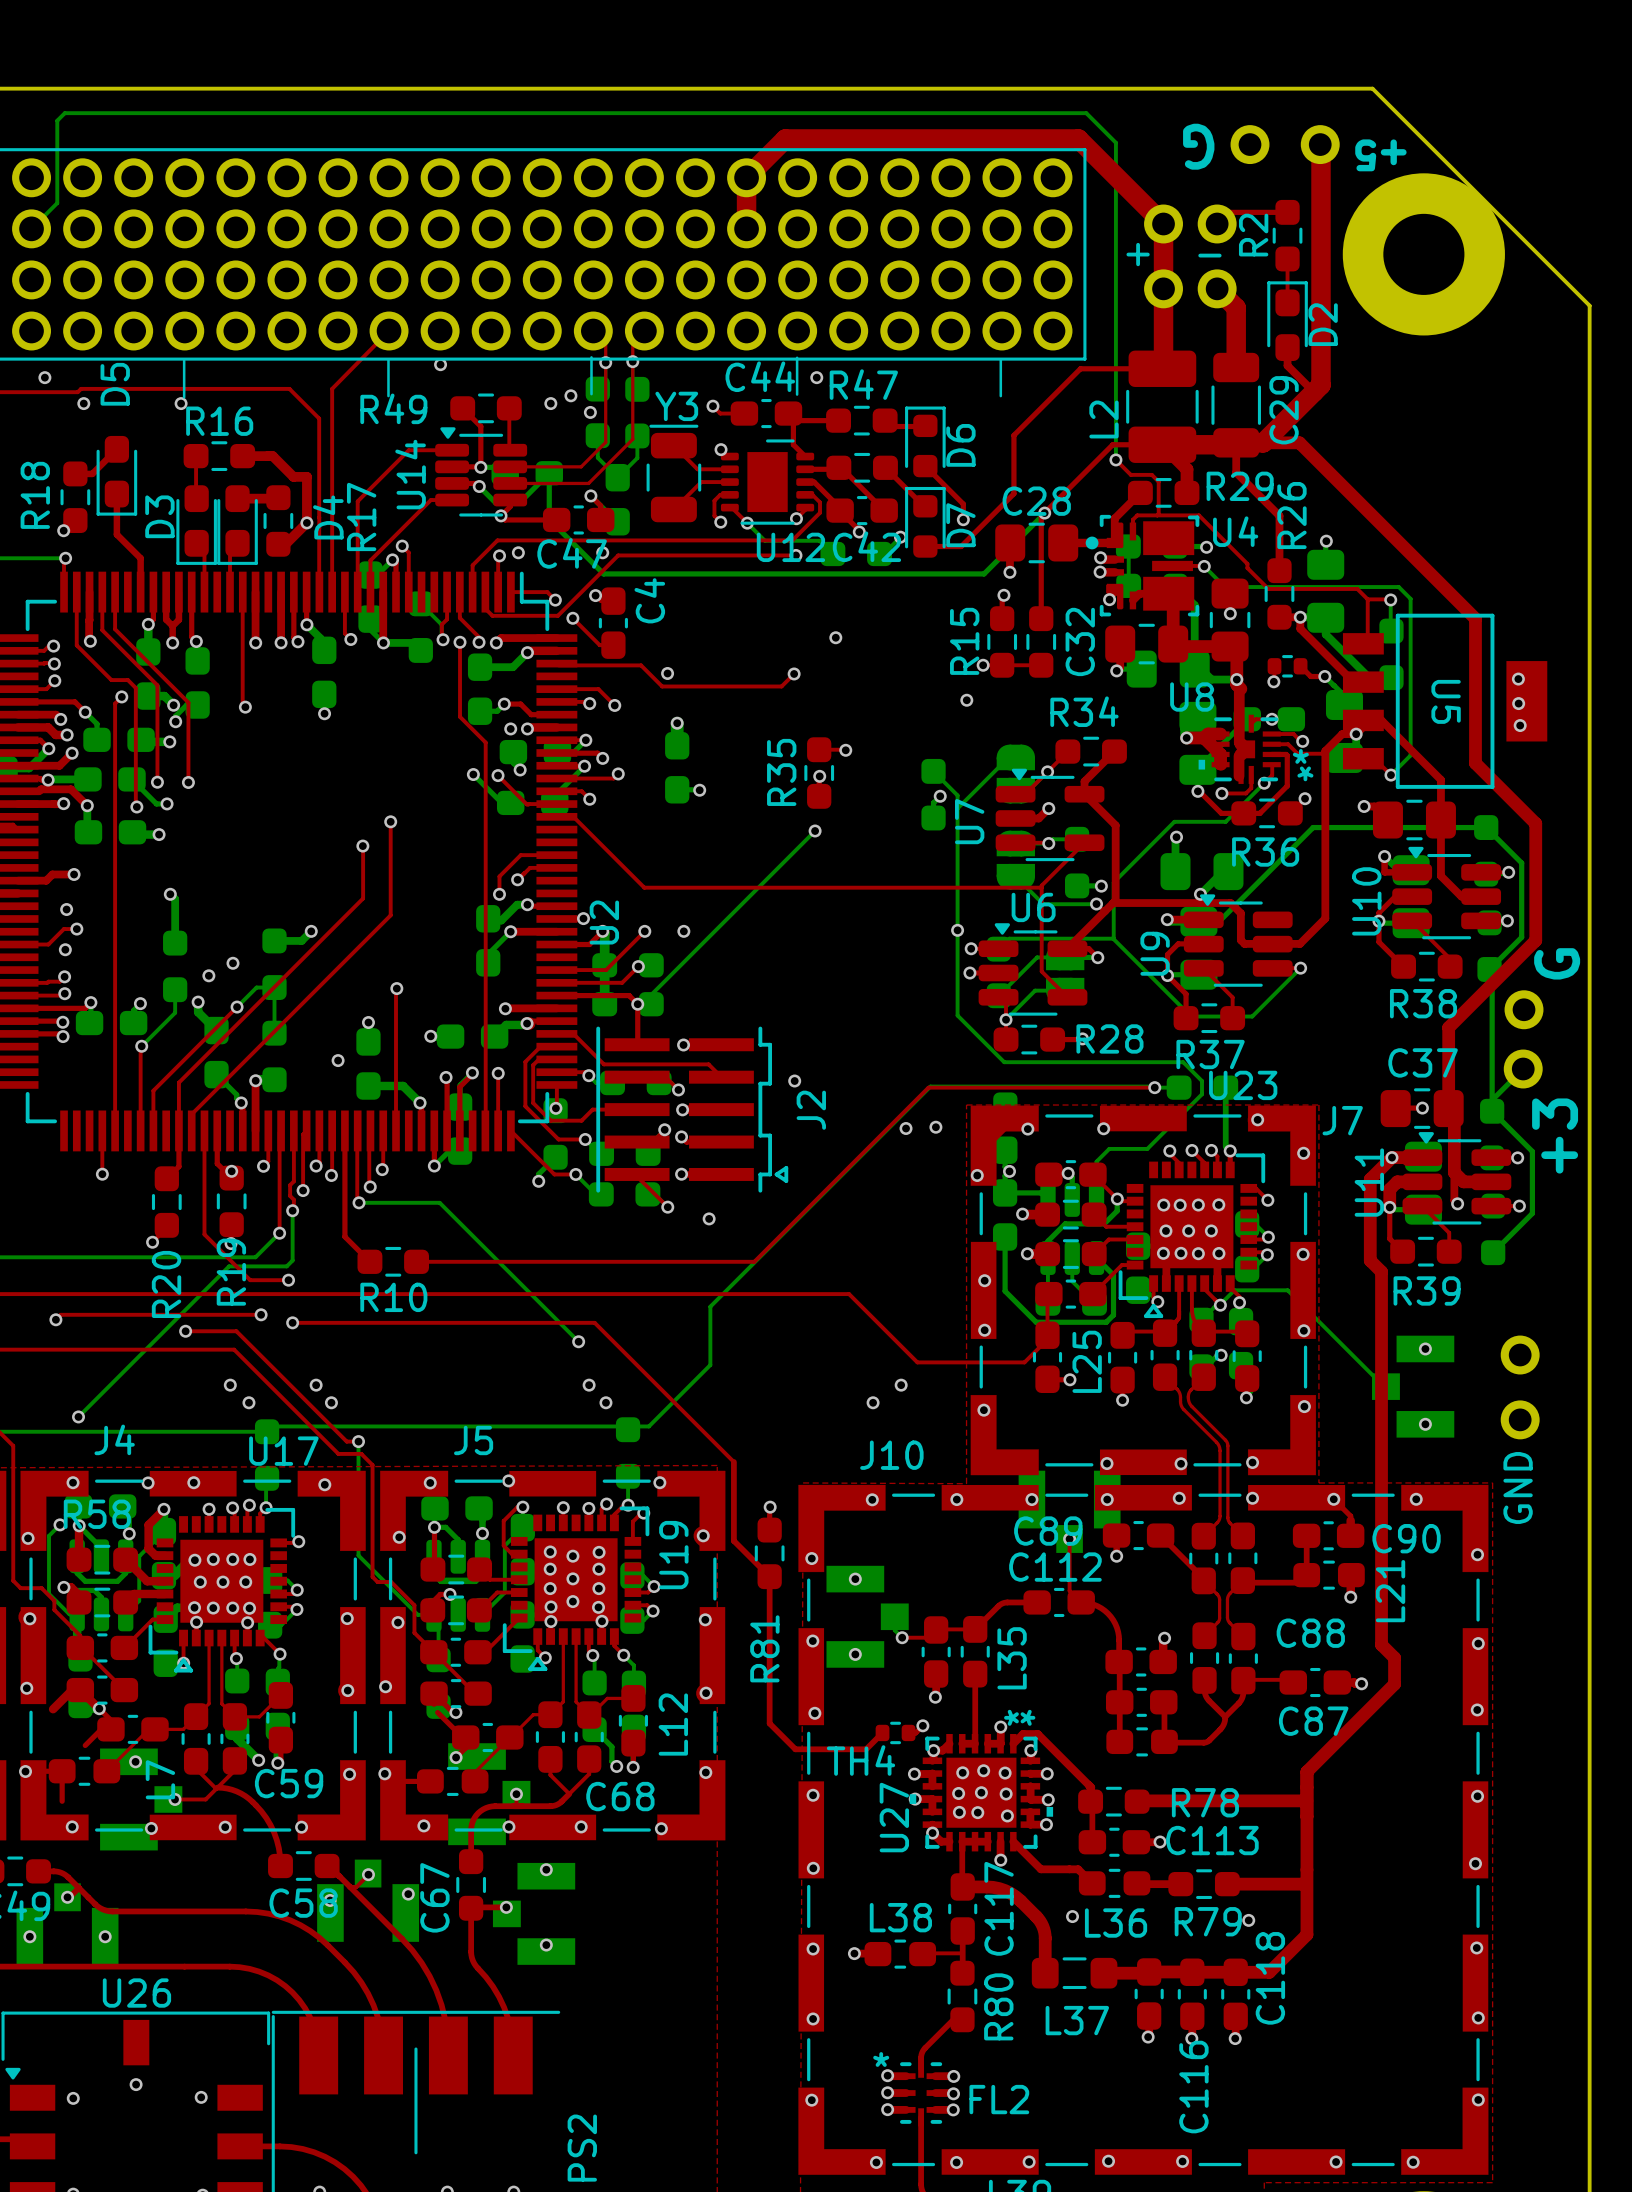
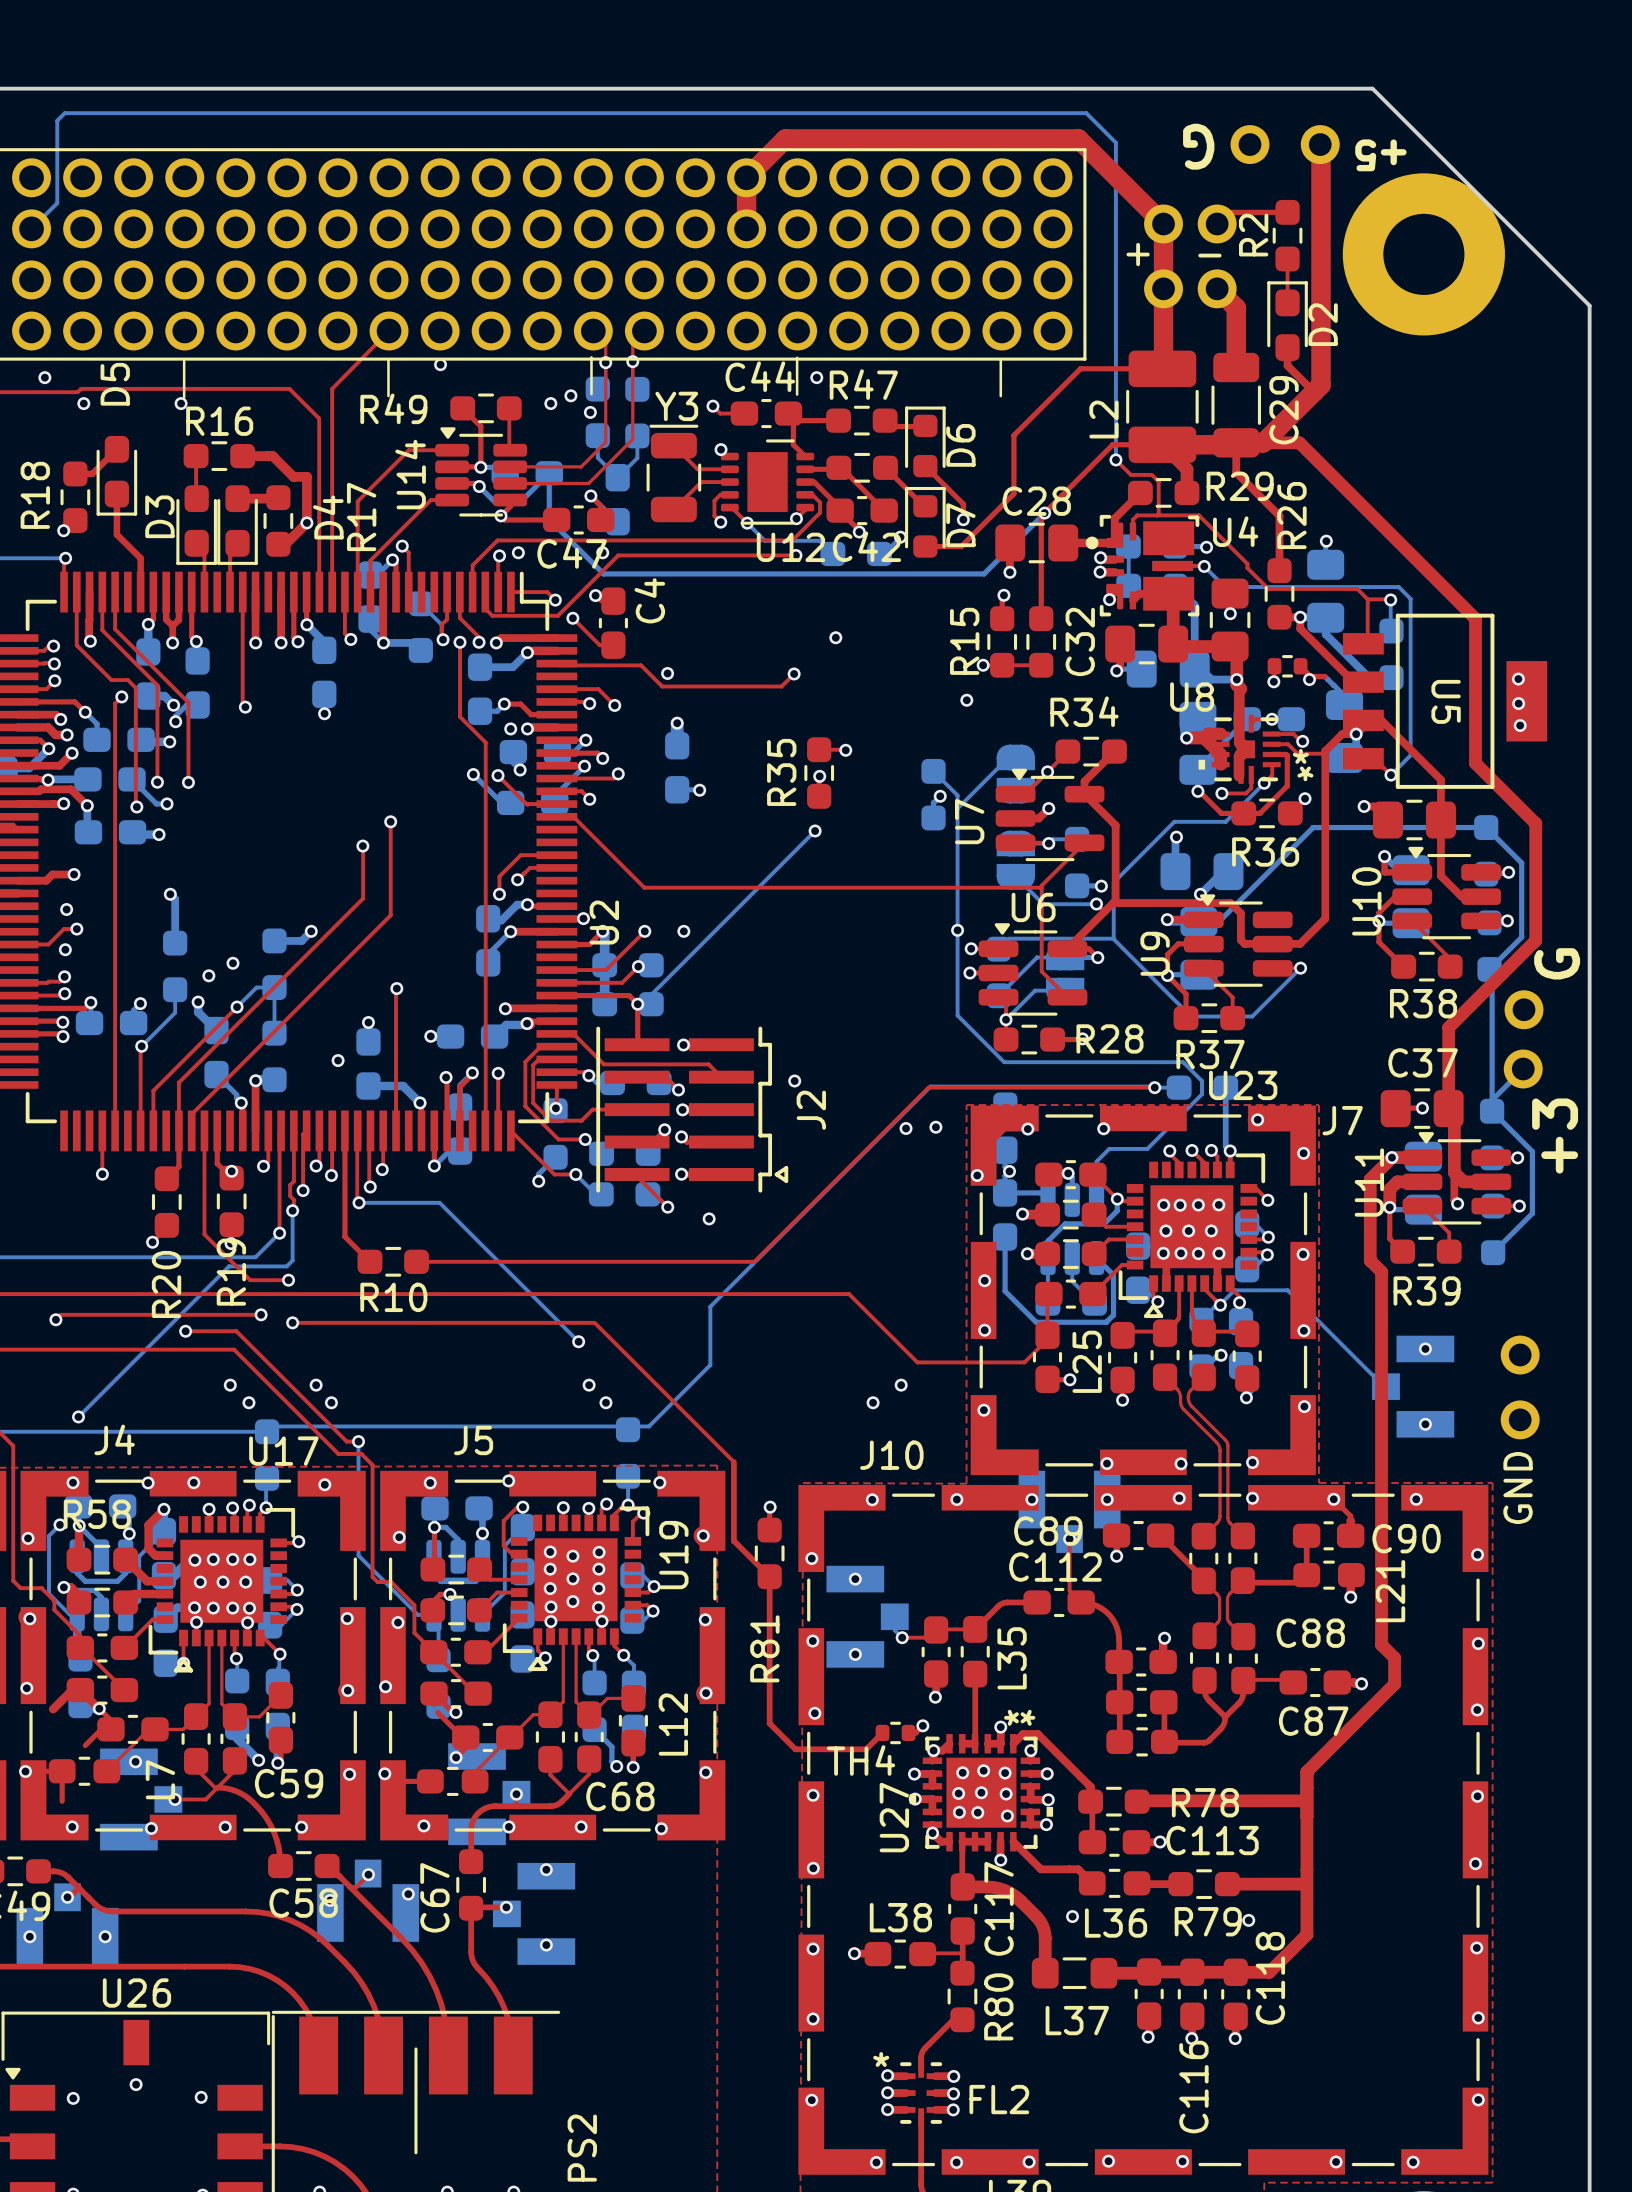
via position: (1324, 676) -> (1309, 679)

